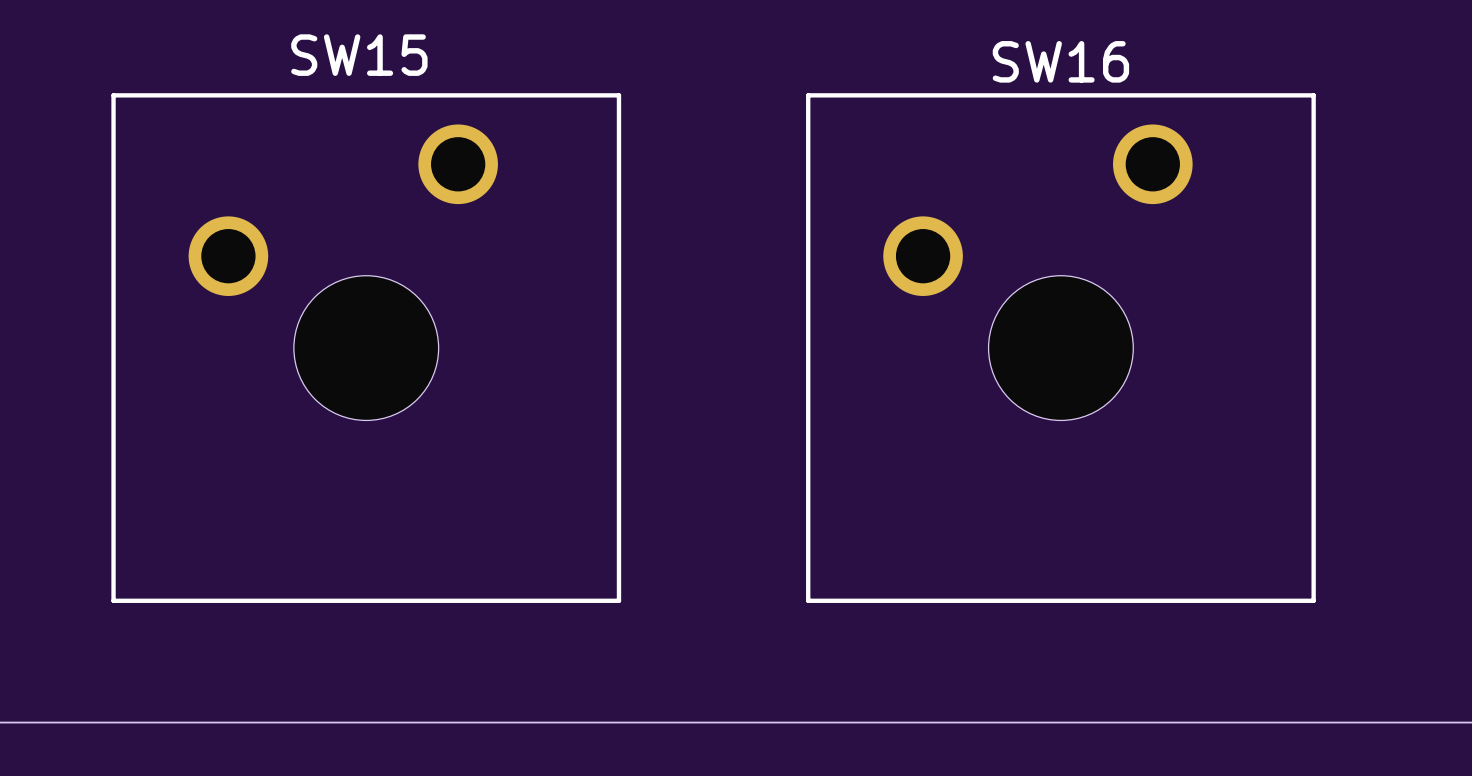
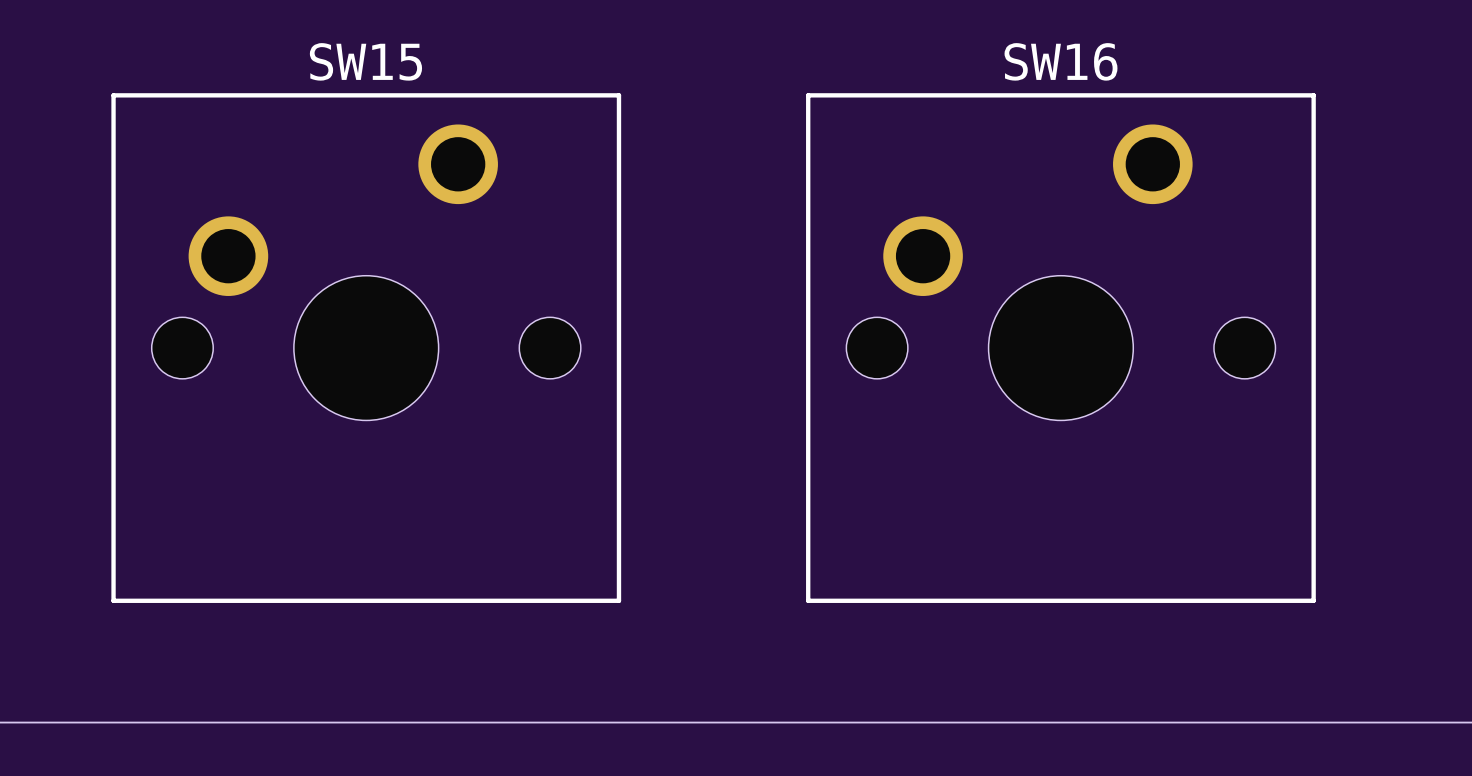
SW15 footprint: [111, 93, 622, 603] -> [111, 93, 622, 603]
SW16 footprint: [806, 93, 1316, 603] -> [806, 93, 1316, 603]

